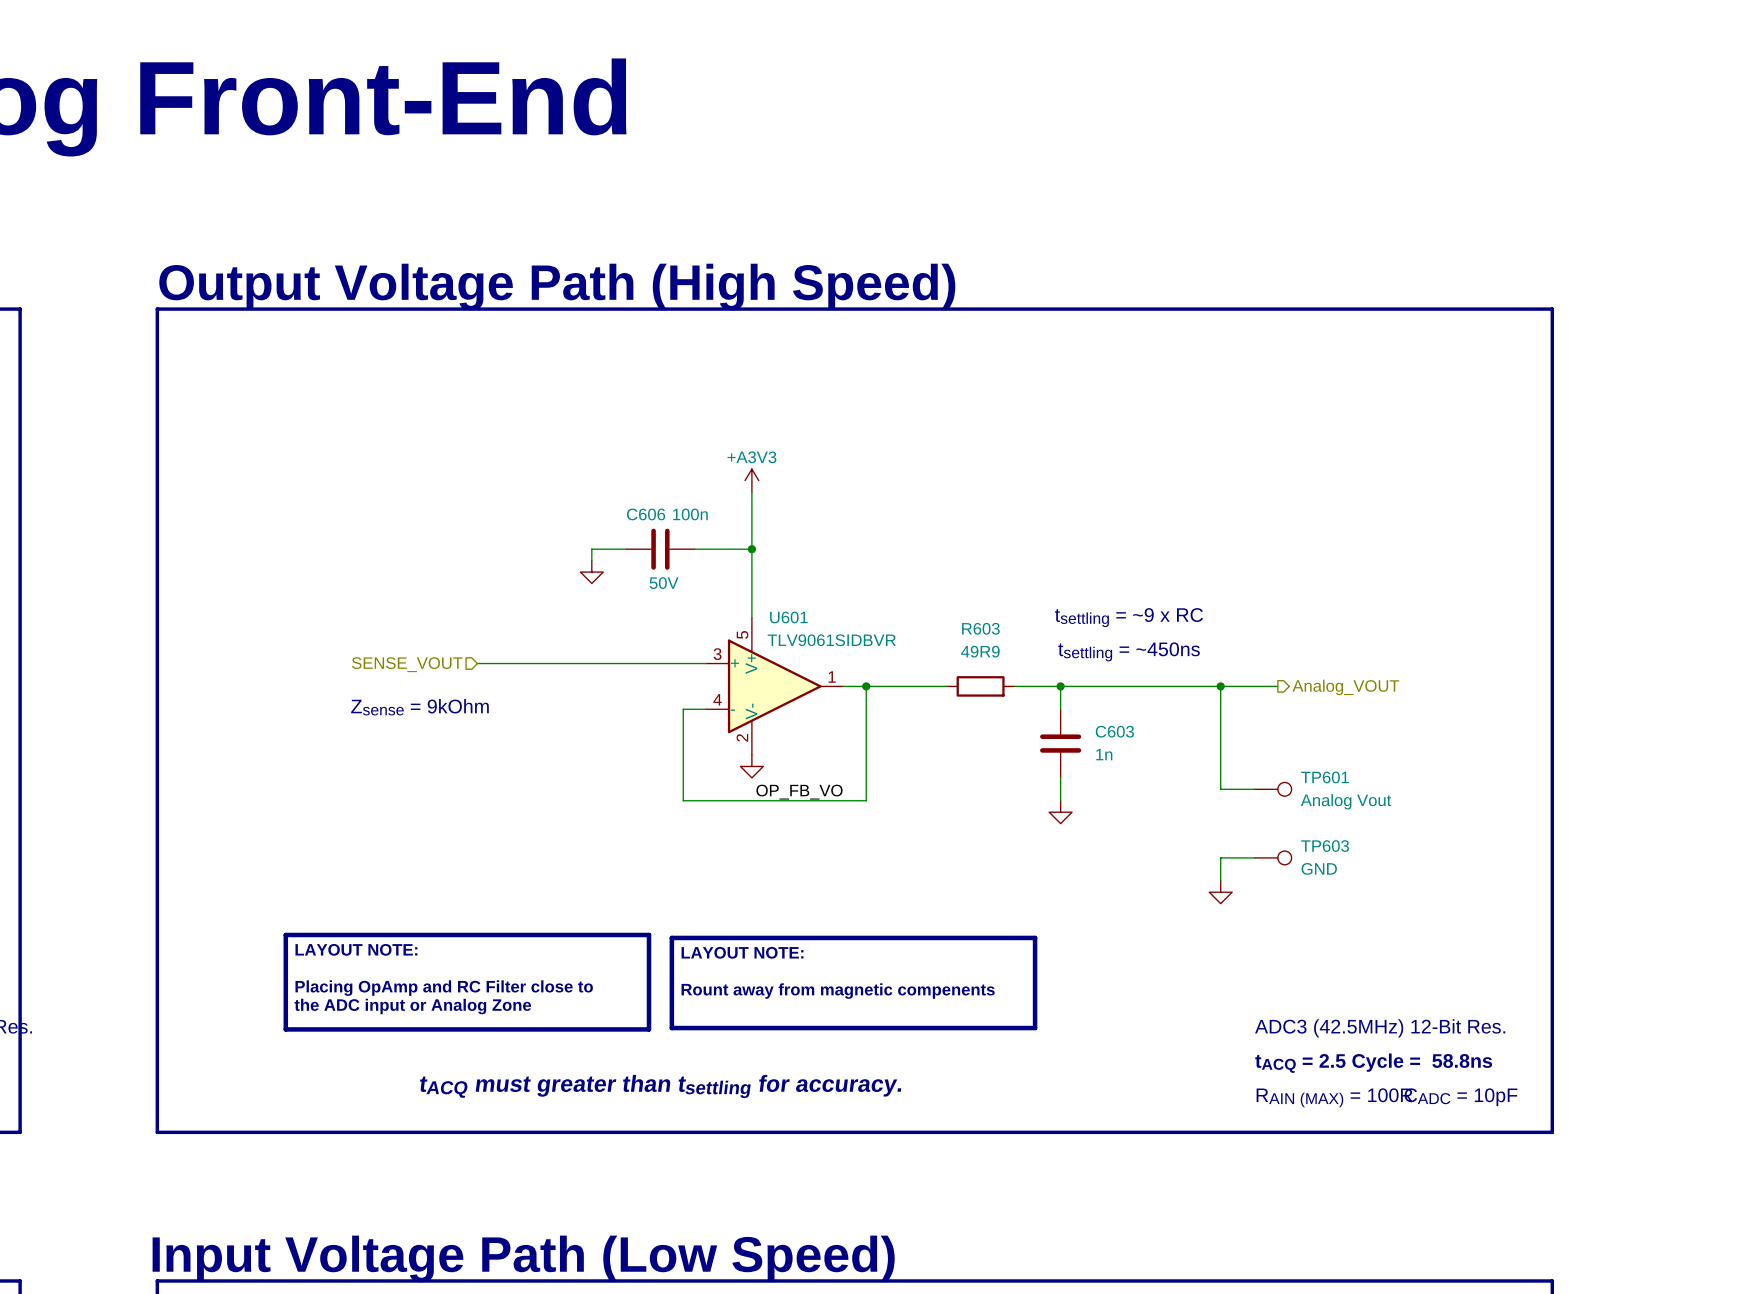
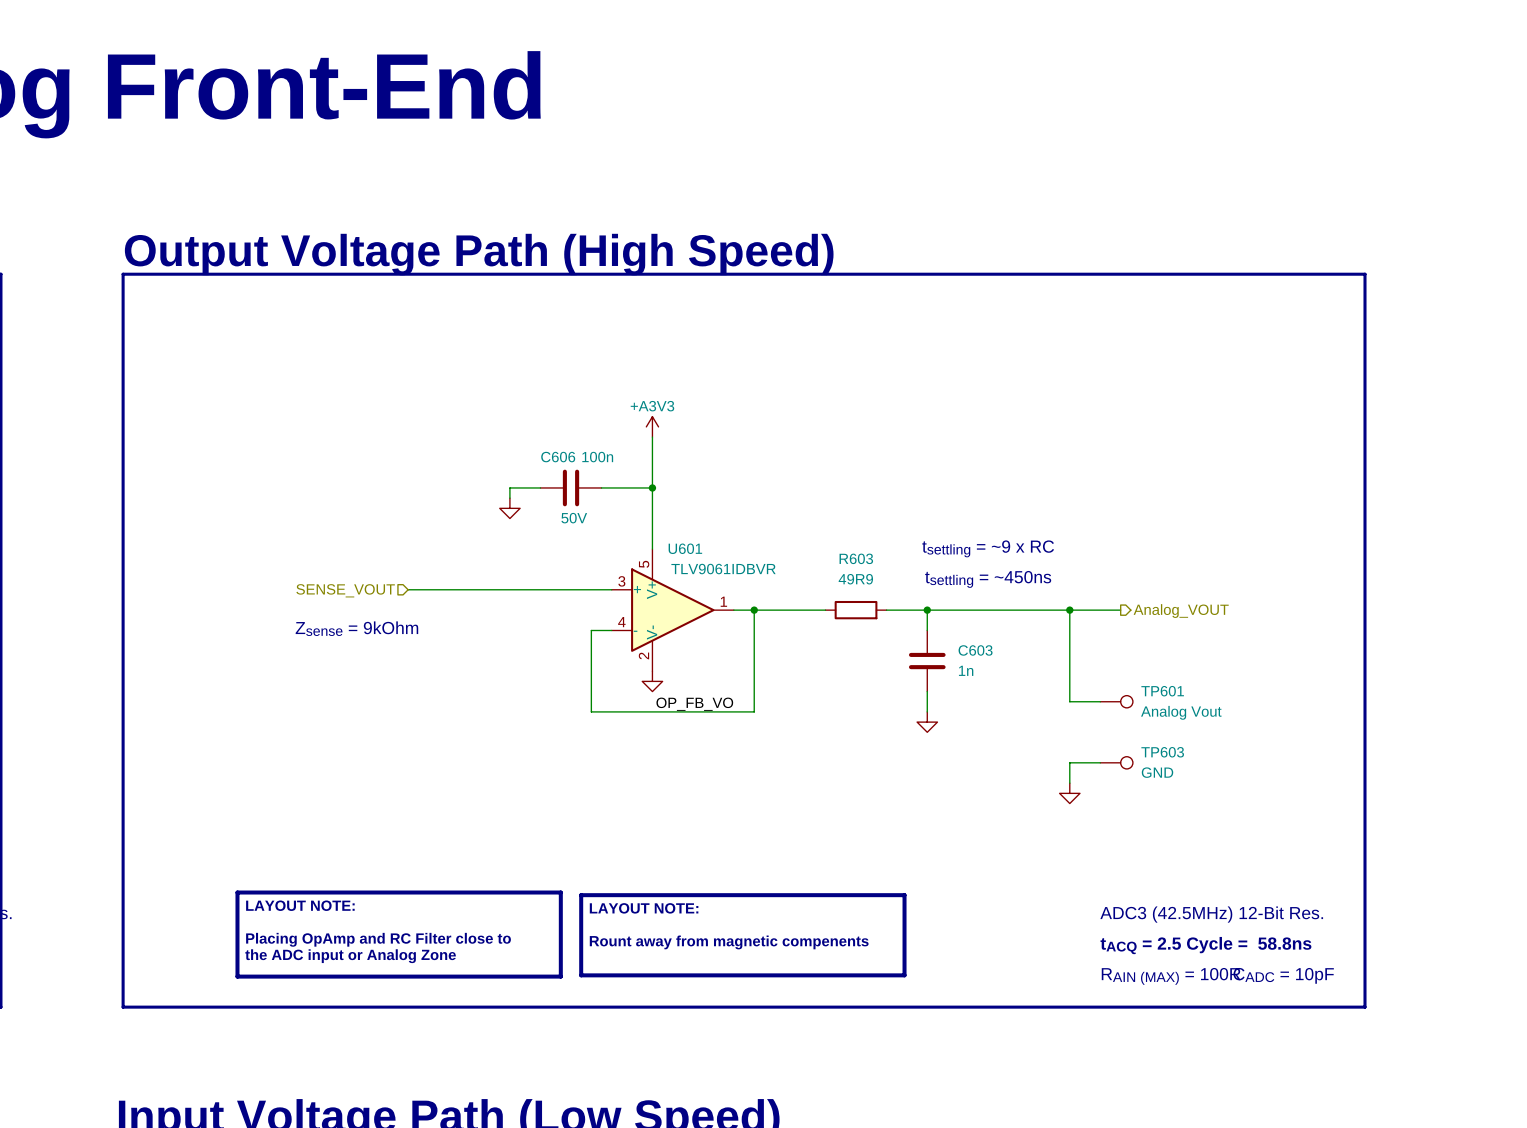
U601 value: TLV9061SIDBVR (831, 640) -> TLV9061IDBVR (723, 569)
text position: LAYOUT NOTE: (356, 949) -> LAYOUT NOTE: (300, 905)
text position: LAYOUT NOTE: (742, 952) -> LAYOUT NOTE: (644, 908)
text position: Placing OpAmp and RC Filter close to (444, 988) -> Placing OpAmp and RC Filter close to (378, 939)
text position: Rount away from magnetic compenents (838, 991) -> Rount away from magnetic compenents (729, 942)
line: (285, 1003) (285, 934) (649, 934) (649, 1003) -> (237, 892) (560, 892)
text position: the ADC input or Analog Zone (412, 1006) -> the ADC input or Analog Zone (350, 956)
line: (671, 1006) (671, 937) (1035, 937) (1035, 1006) -> (581, 895) (904, 895)
line: (671, 1028) (1035, 1028) -> (581, 914) (581, 975) (904, 975) (904, 914)
line: (285, 1029) (649, 1029) -> (237, 915) (237, 976) (560, 976) (560, 915)
text: tACQ must greater than tsettling for accuracy. (660, 1086) -> none

